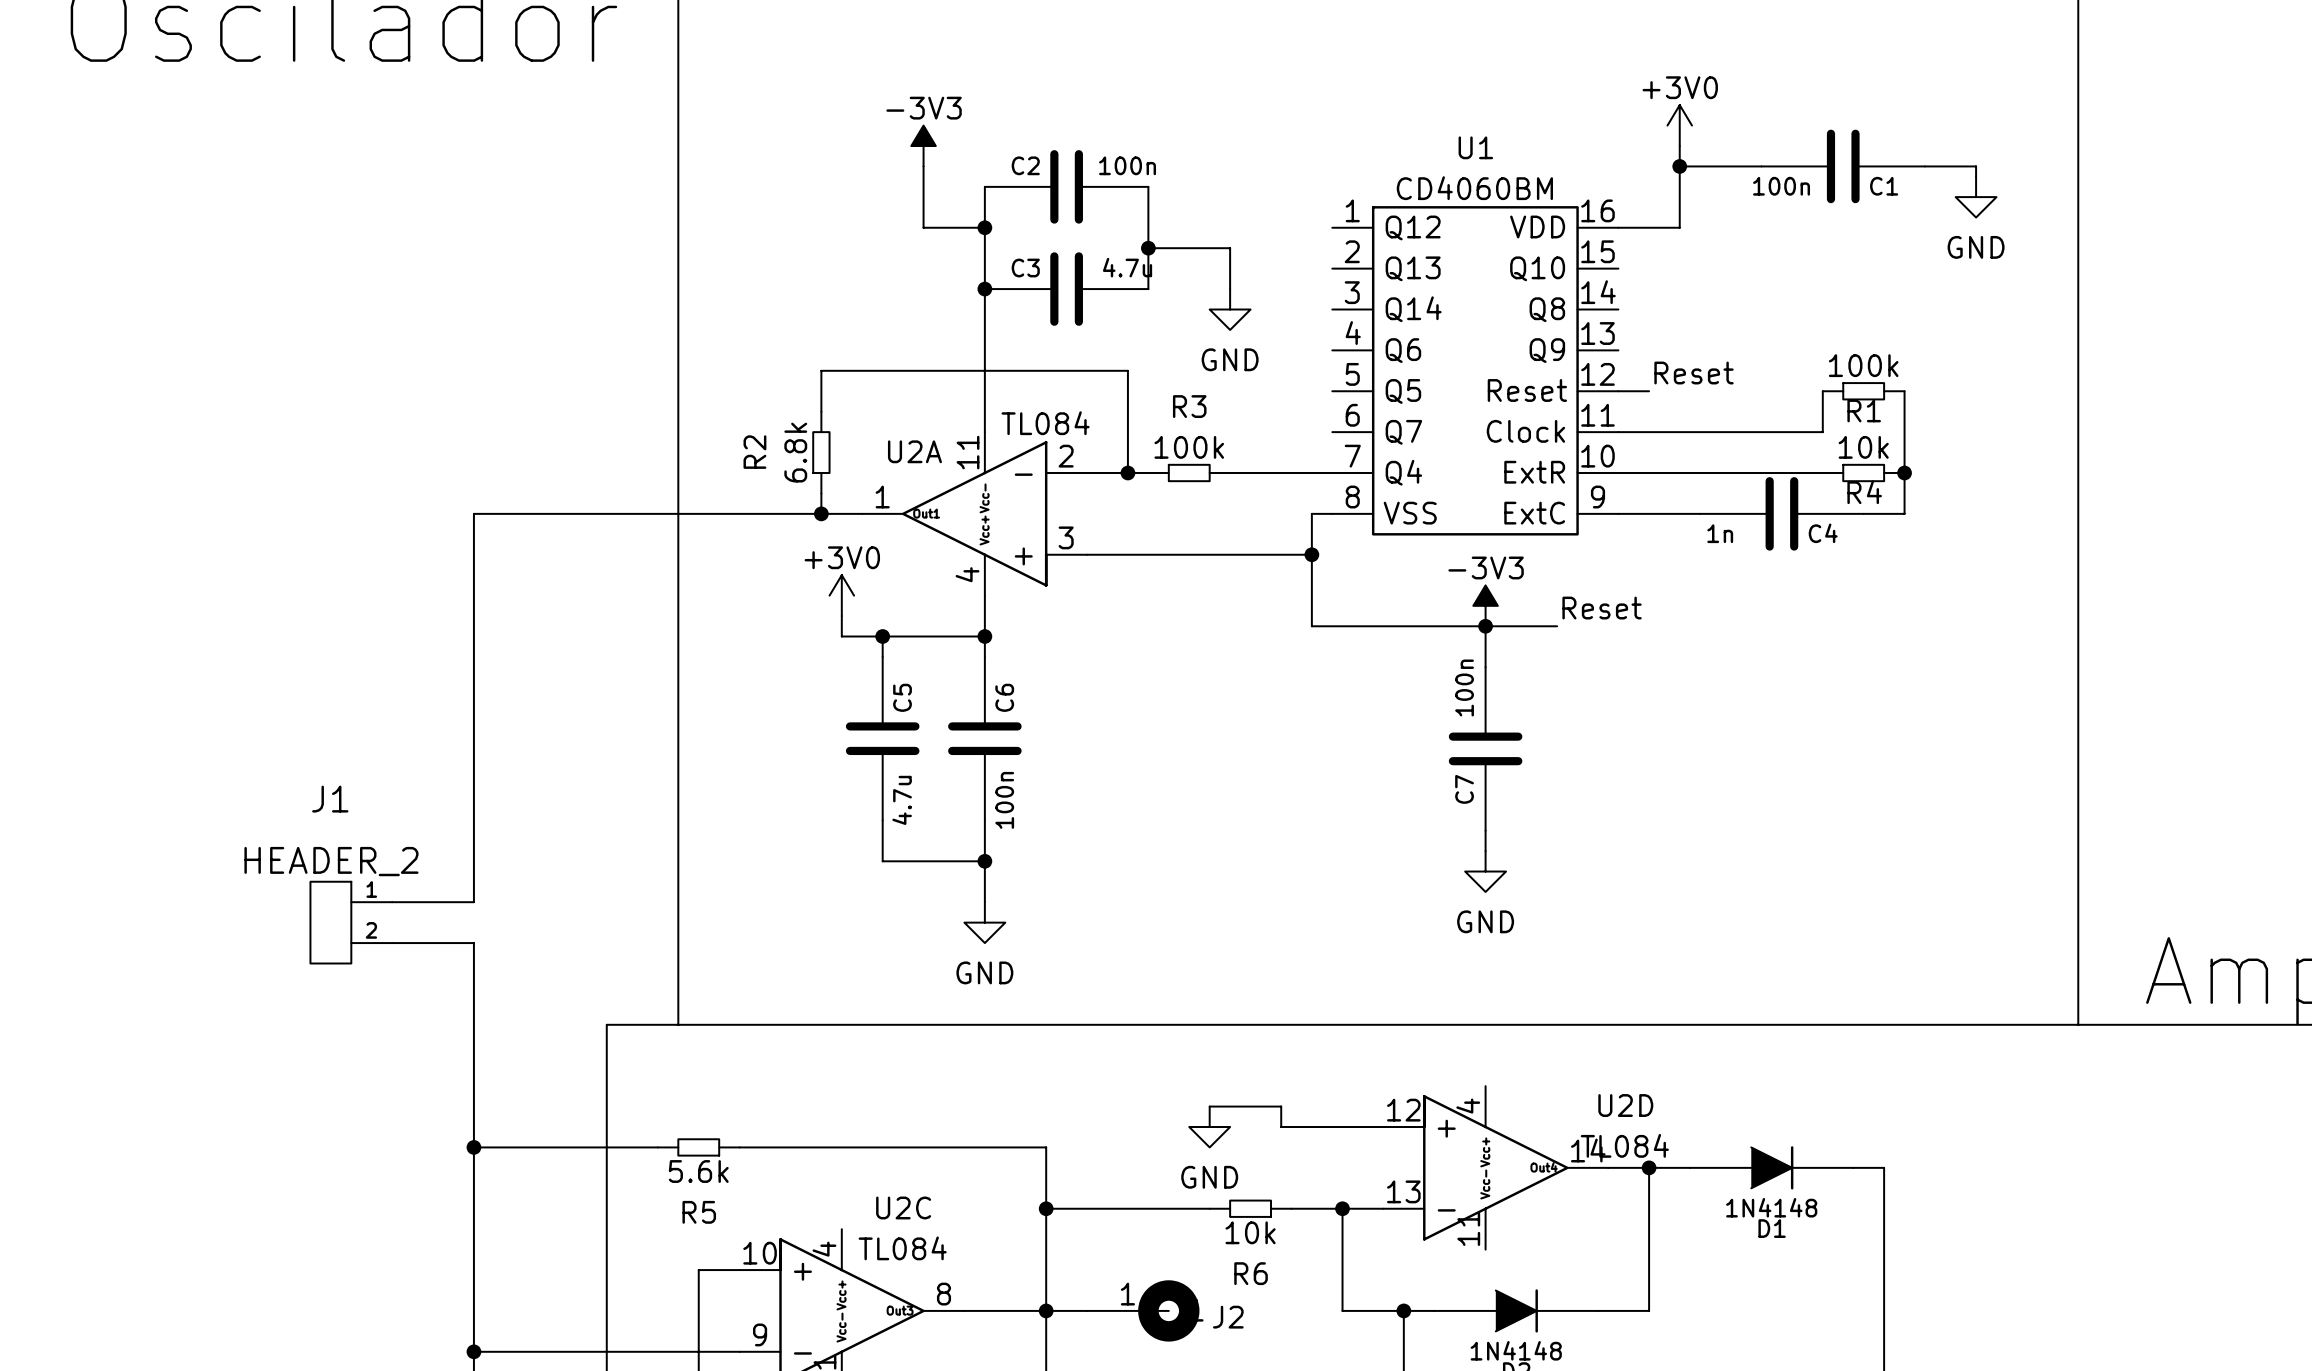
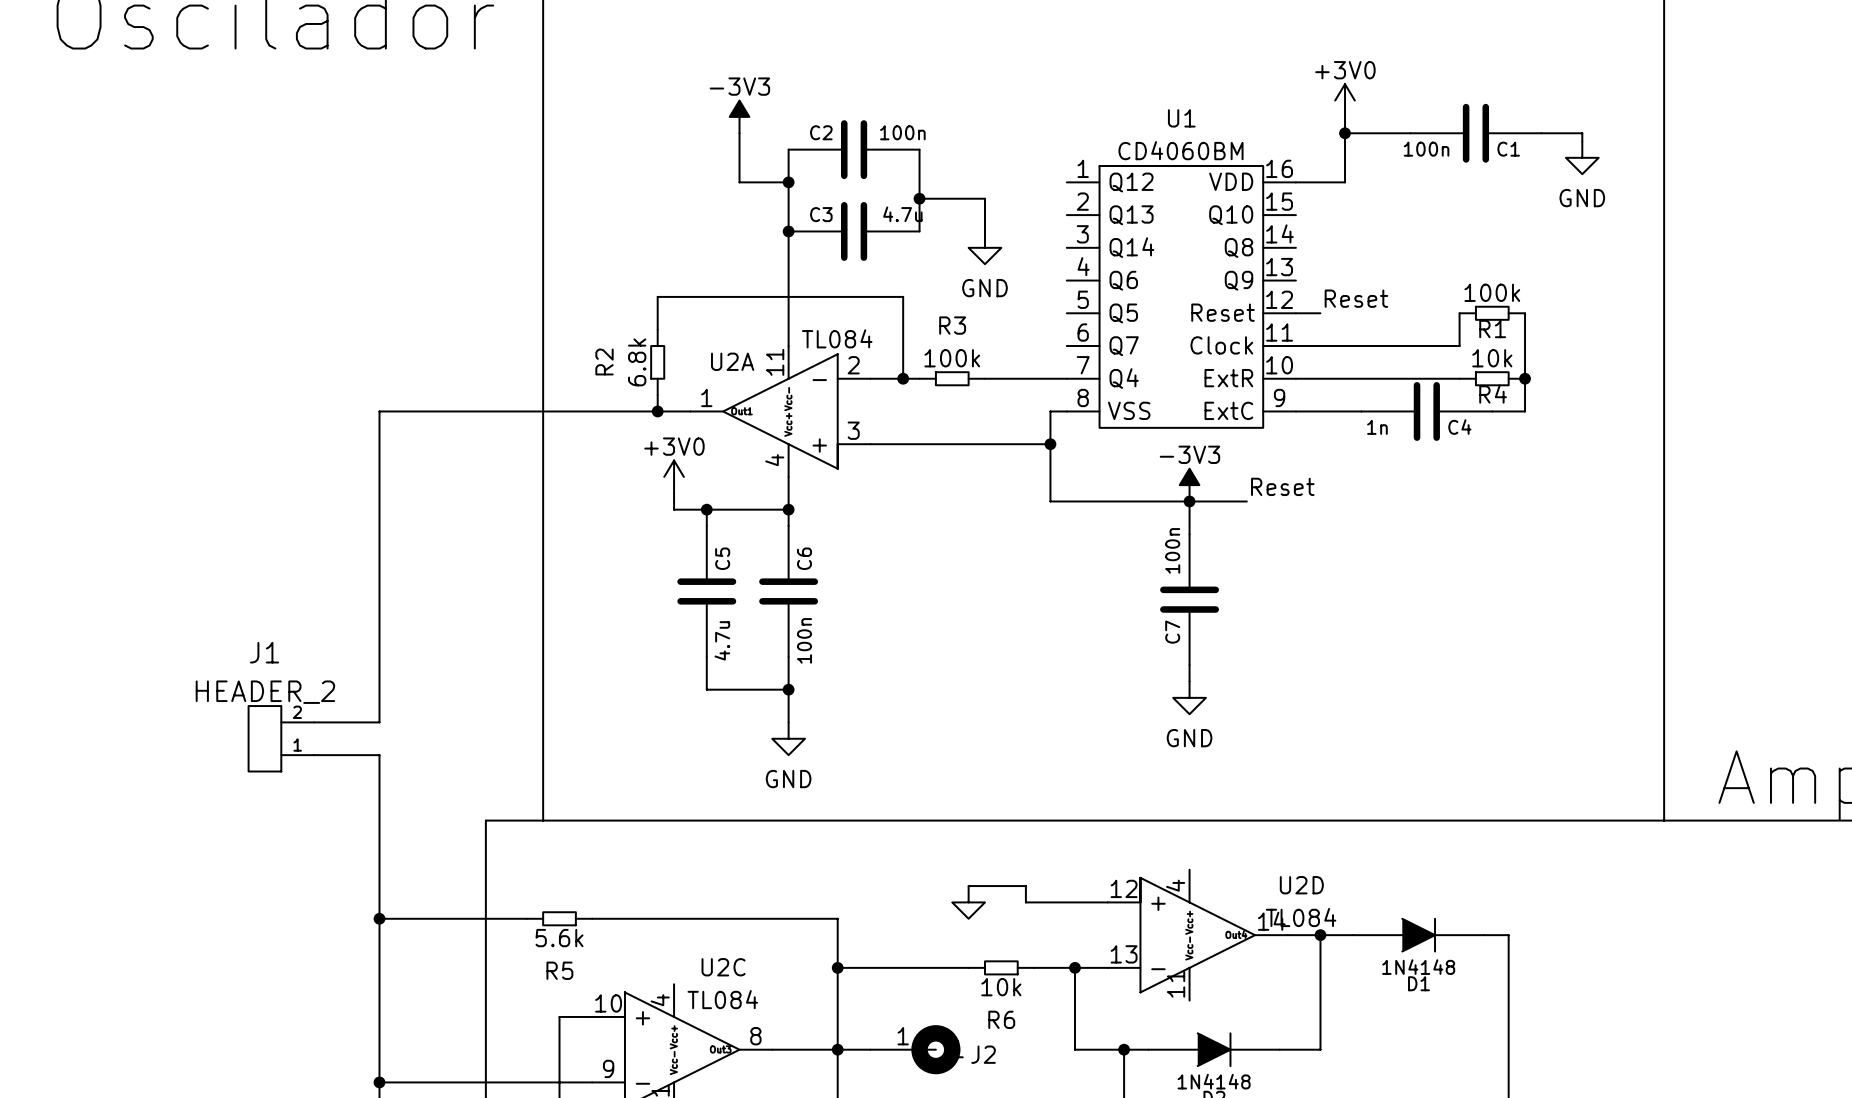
J1 flip: as is (330, 922) -> up-down (264, 738)
power symbol text: GND (1209, 1177) -> none

